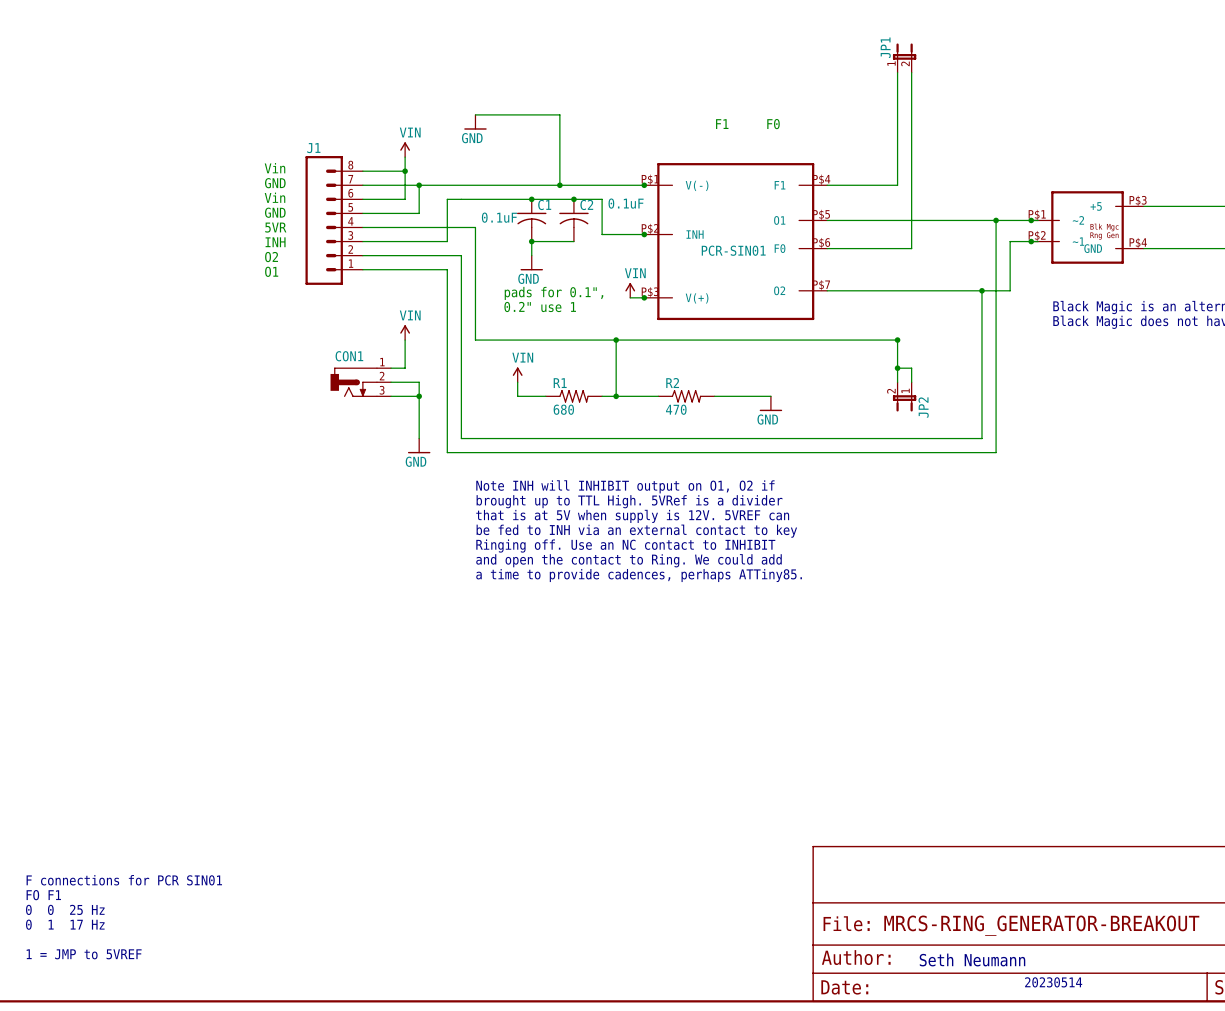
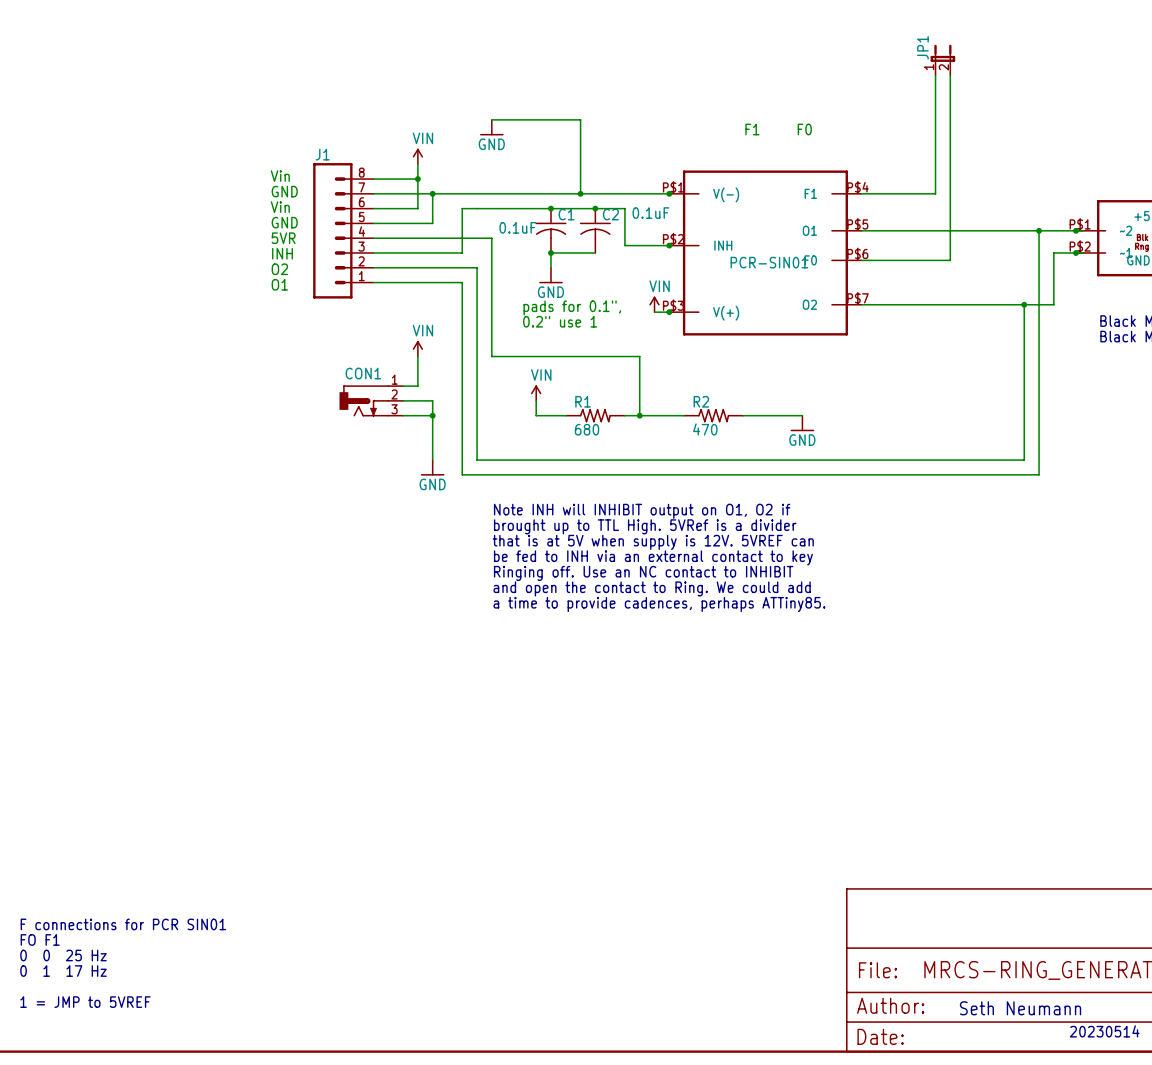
wire: (616, 340) (897, 340) (897, 382) -> none
junction: (616, 340) -> none
junction: (897, 340) -> none
wire: (897, 368) (911, 368) (911, 382) -> none
junction: (897, 368) -> none
JP2: (904, 396) -> none

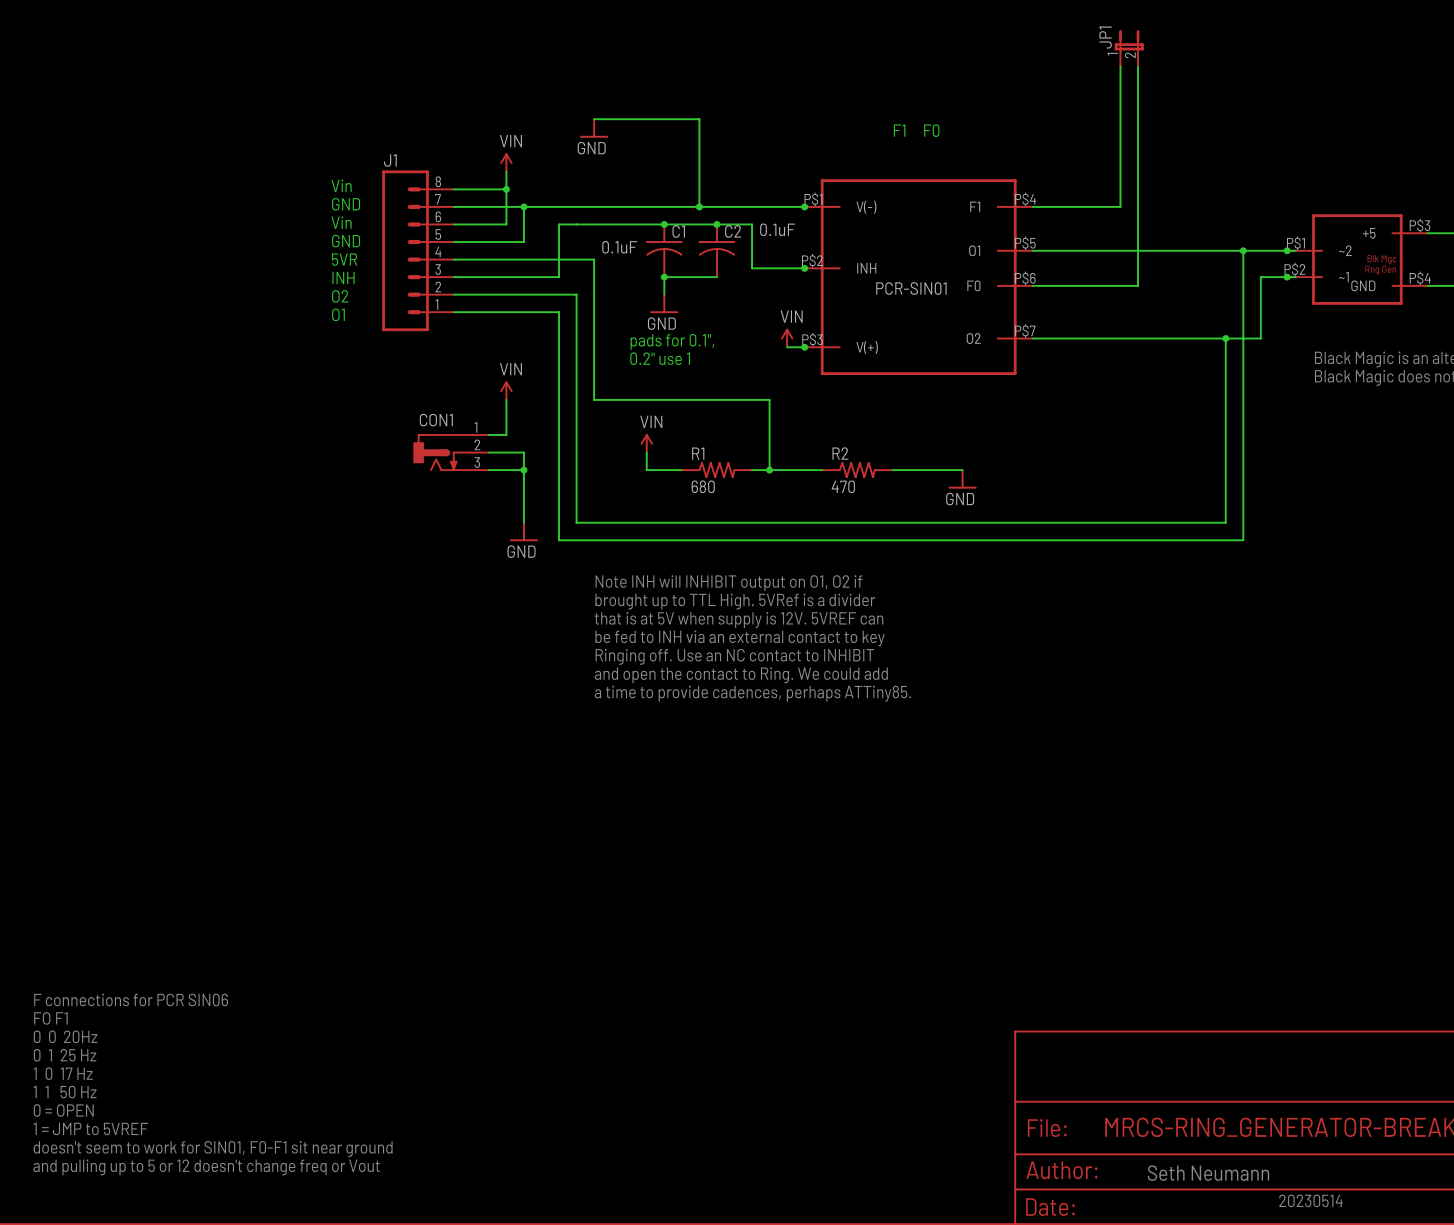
text: none -> F connections for PCR SIN06 (131, 999)
text: none -> FO F1 (50, 1018)
text: none -> 0 0 20Hz (65, 1036)
text: none -> 0 1 25 Hz (65, 1055)
text: F connections for PCR SIN01 (123, 924) -> 1 0 17 Hz (63, 1073)
text: FO F1 (40, 939) -> 1 1 50 Hz (65, 1092)
text: 0 0 25 Hz (63, 955) -> 0 = OPEN (63, 1110)
text: 0 1 17 Hz (63, 971) -> 1 = JMP to 5VREF (90, 1128)
text: none -> doesn't seem to work for SIN01, F0-F1 sit near ground (213, 1149)
text: 1 = JMP to 5VREF (85, 1002) -> and pulling up to 5 or 12 doesn't change freq or Vout (206, 1167)

